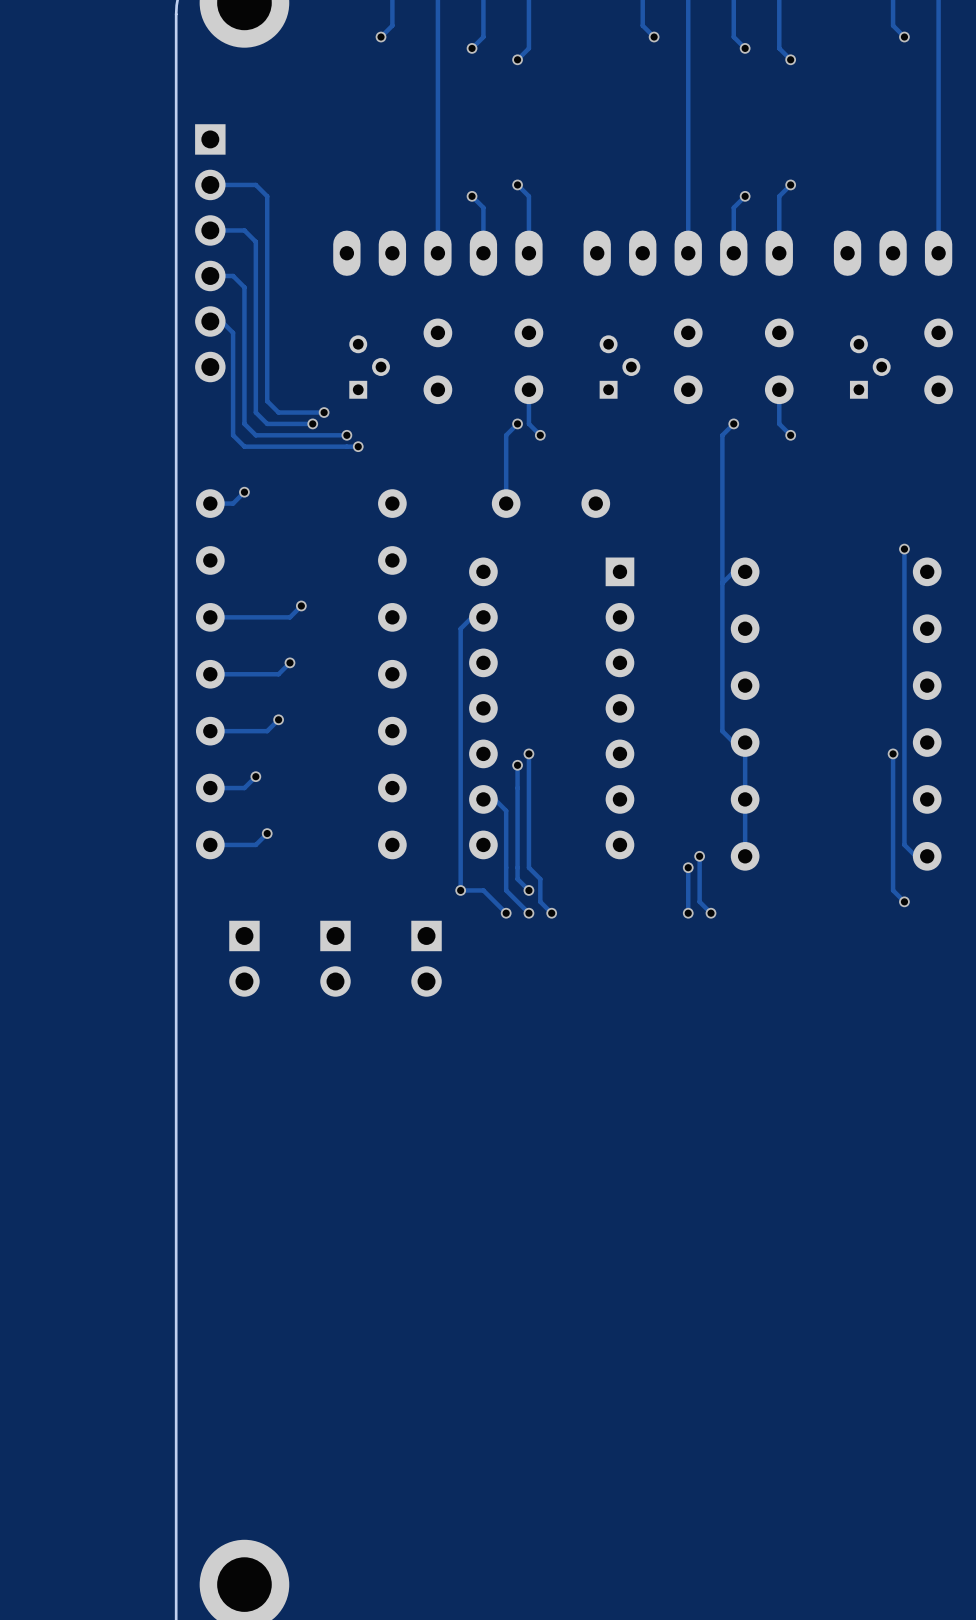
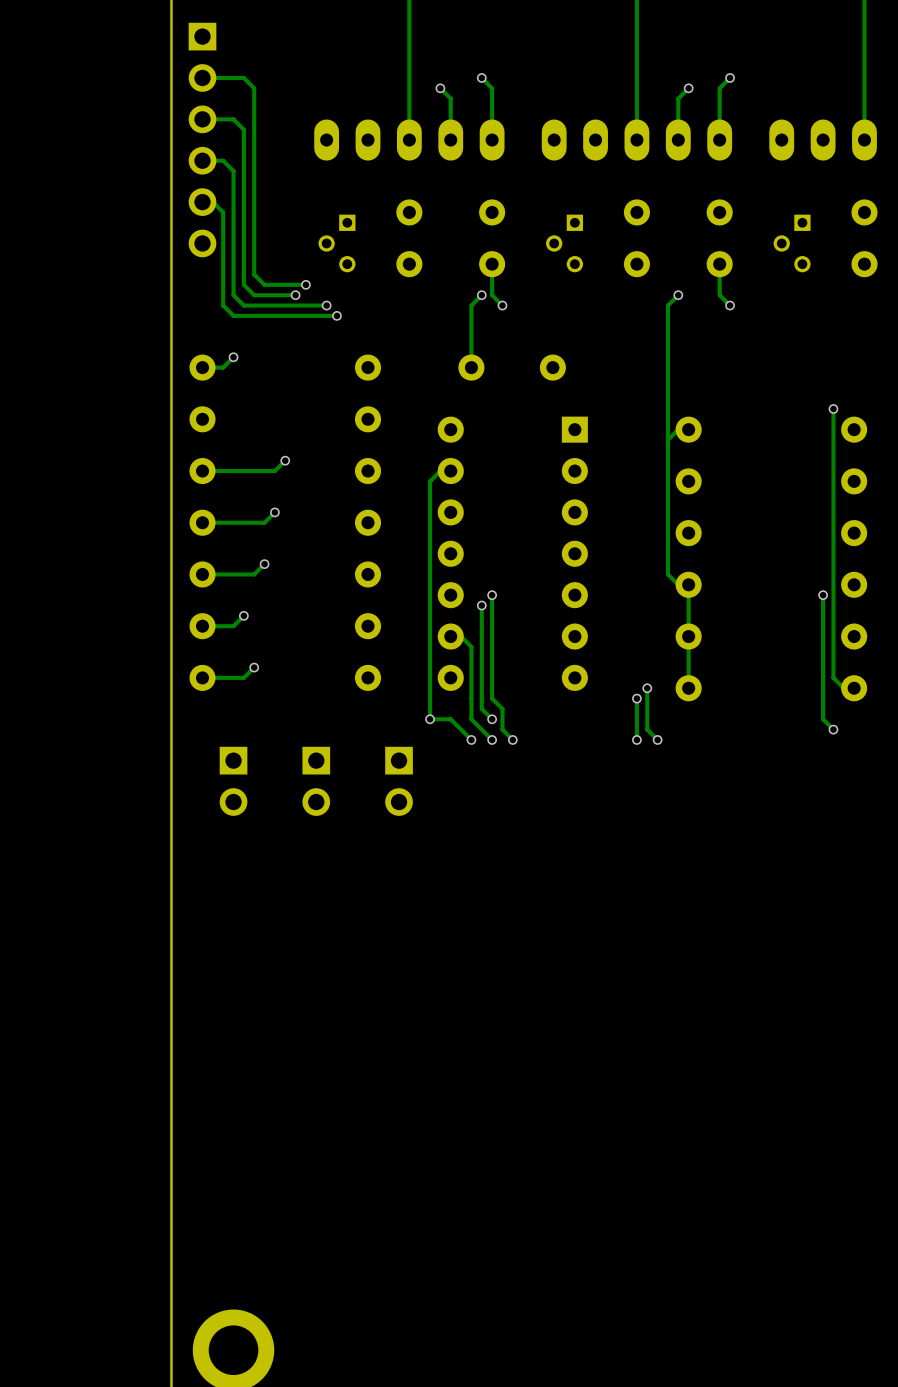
part rotation: 0° (369, 367) -> 180° (336, 243)
part rotation: 0° (619, 367) -> 180° (564, 243)
part rotation: 0° (870, 367) -> 180° (792, 243)

